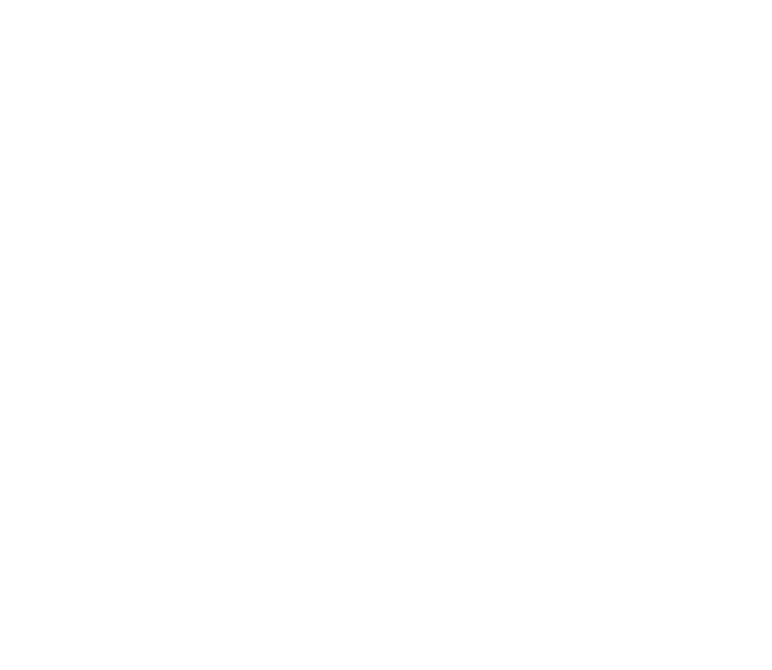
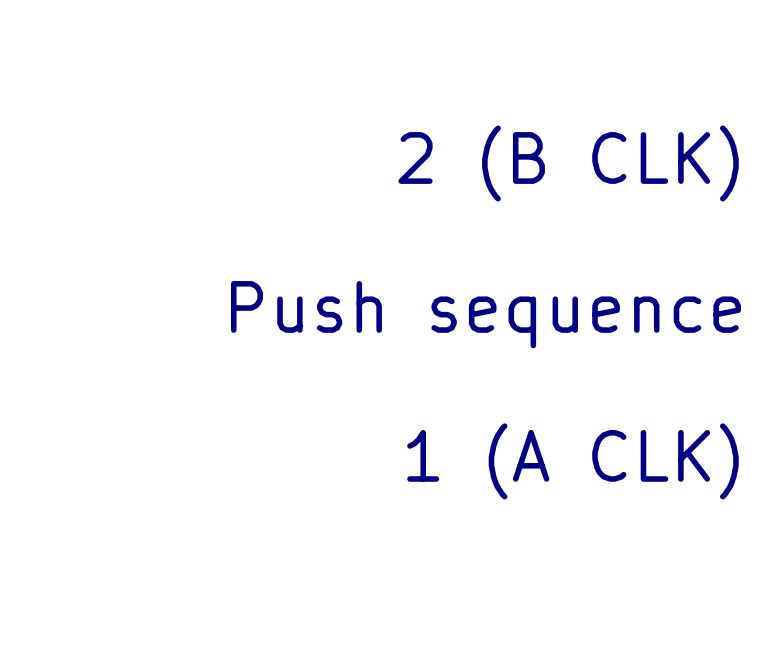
text: none -> 2 (B CLK) (568, 163)
text: none -> Push sequence (485, 314)
text: none -> 1 (A CLK) (572, 461)

